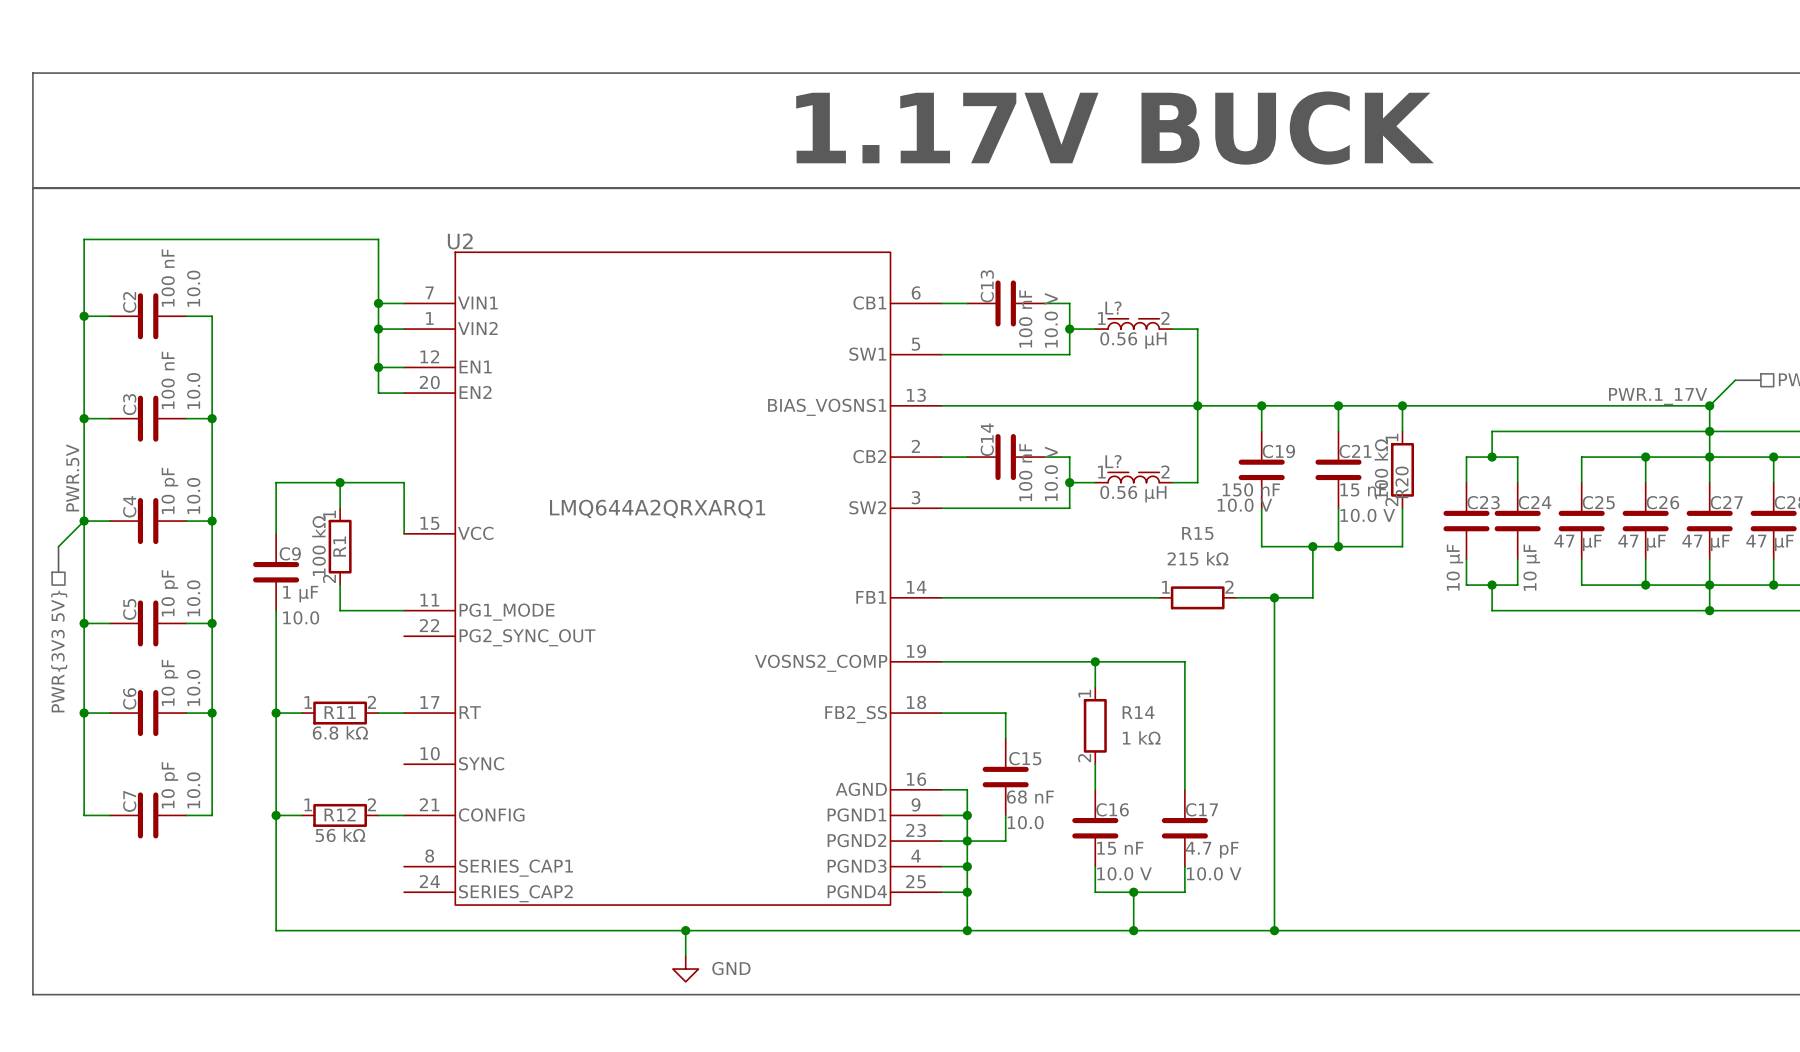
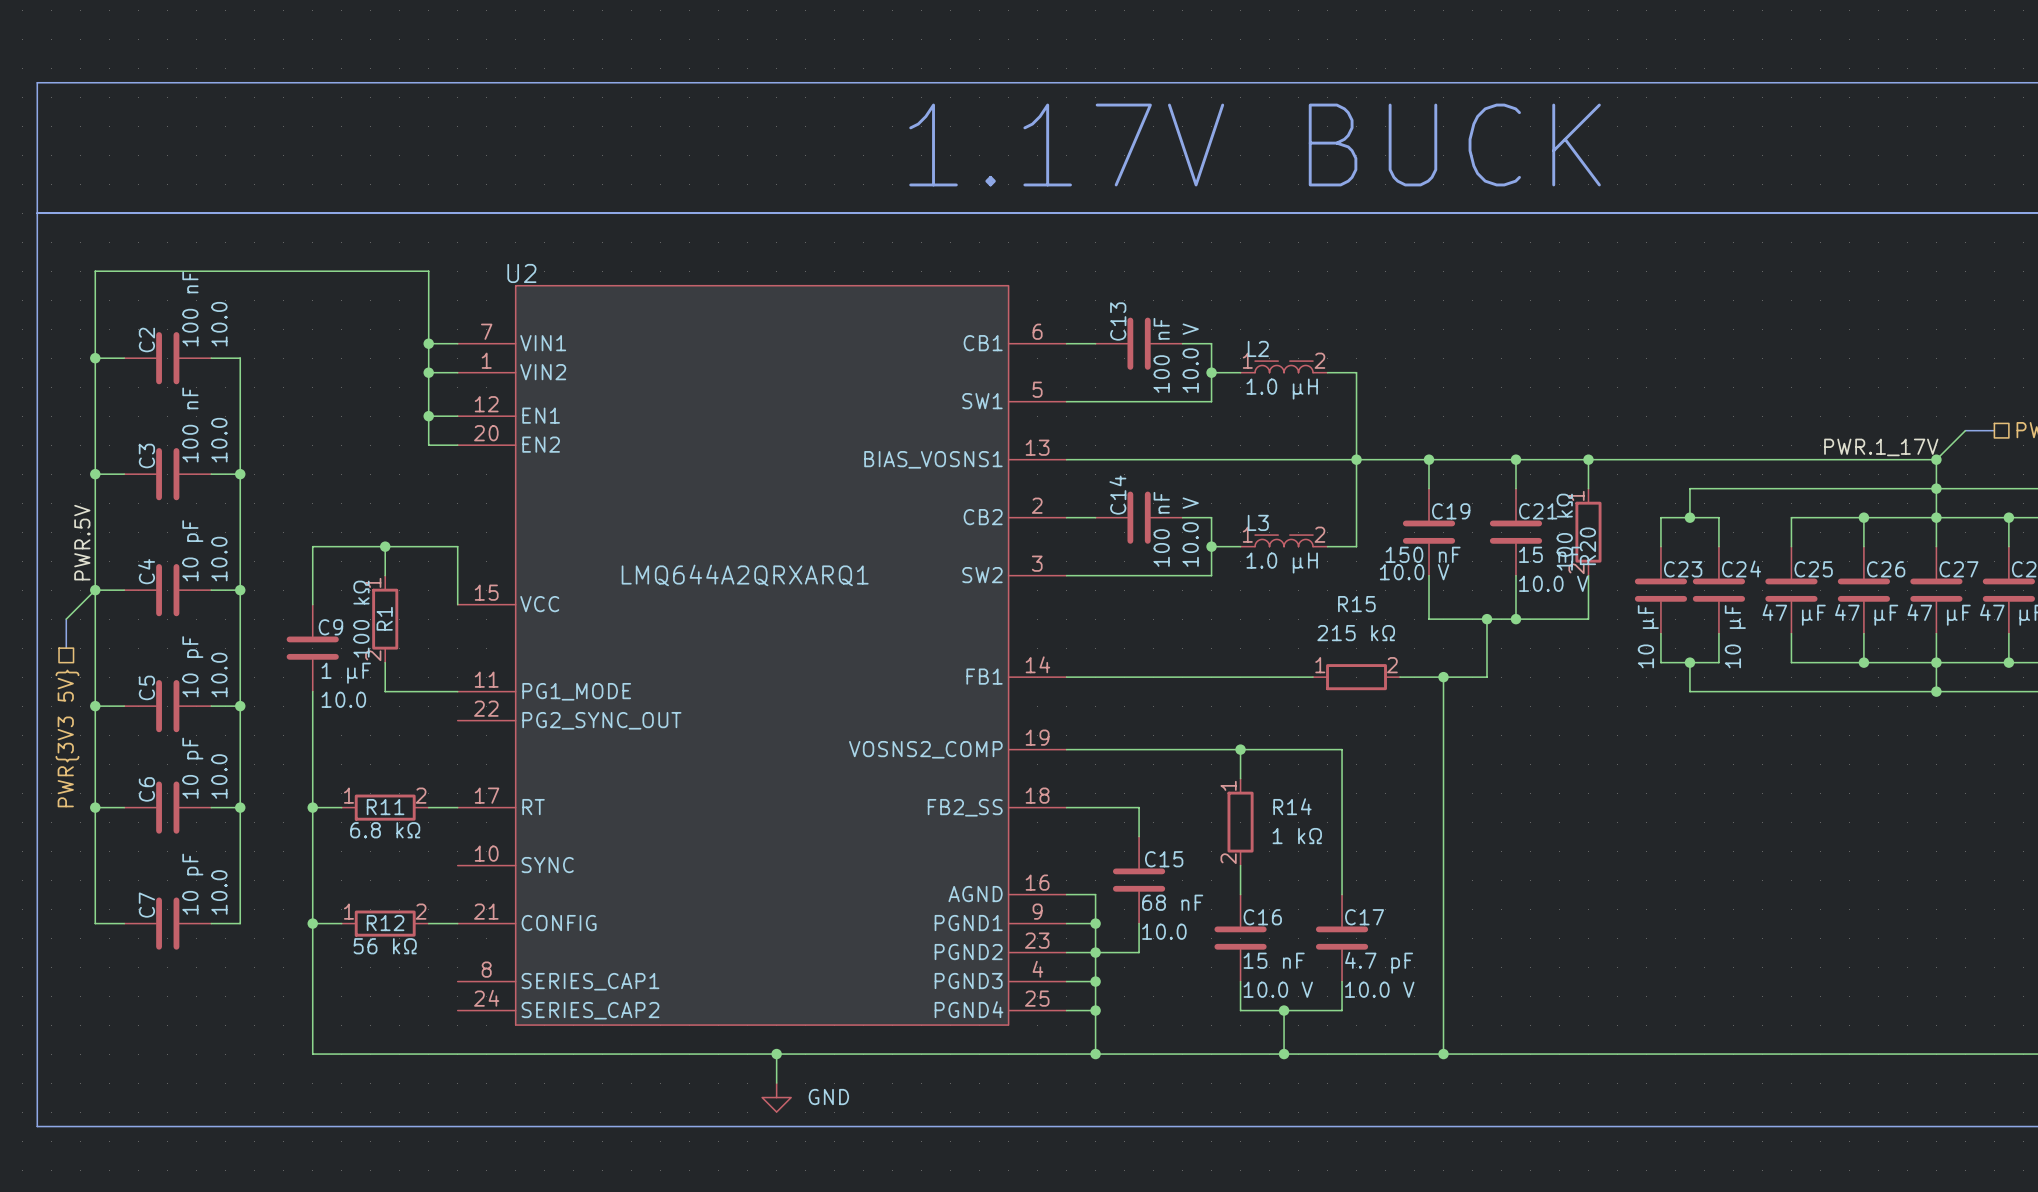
L? name: L? (1113, 307) -> L2 (1258, 348)
L? text: 0.56 µH (1133, 340) -> 1.0 µH (1282, 389)
L? name: L? (1113, 461) -> L3 (1258, 522)
L? text: 0.56 µH (1133, 494) -> 1.0 µH (1282, 563)

